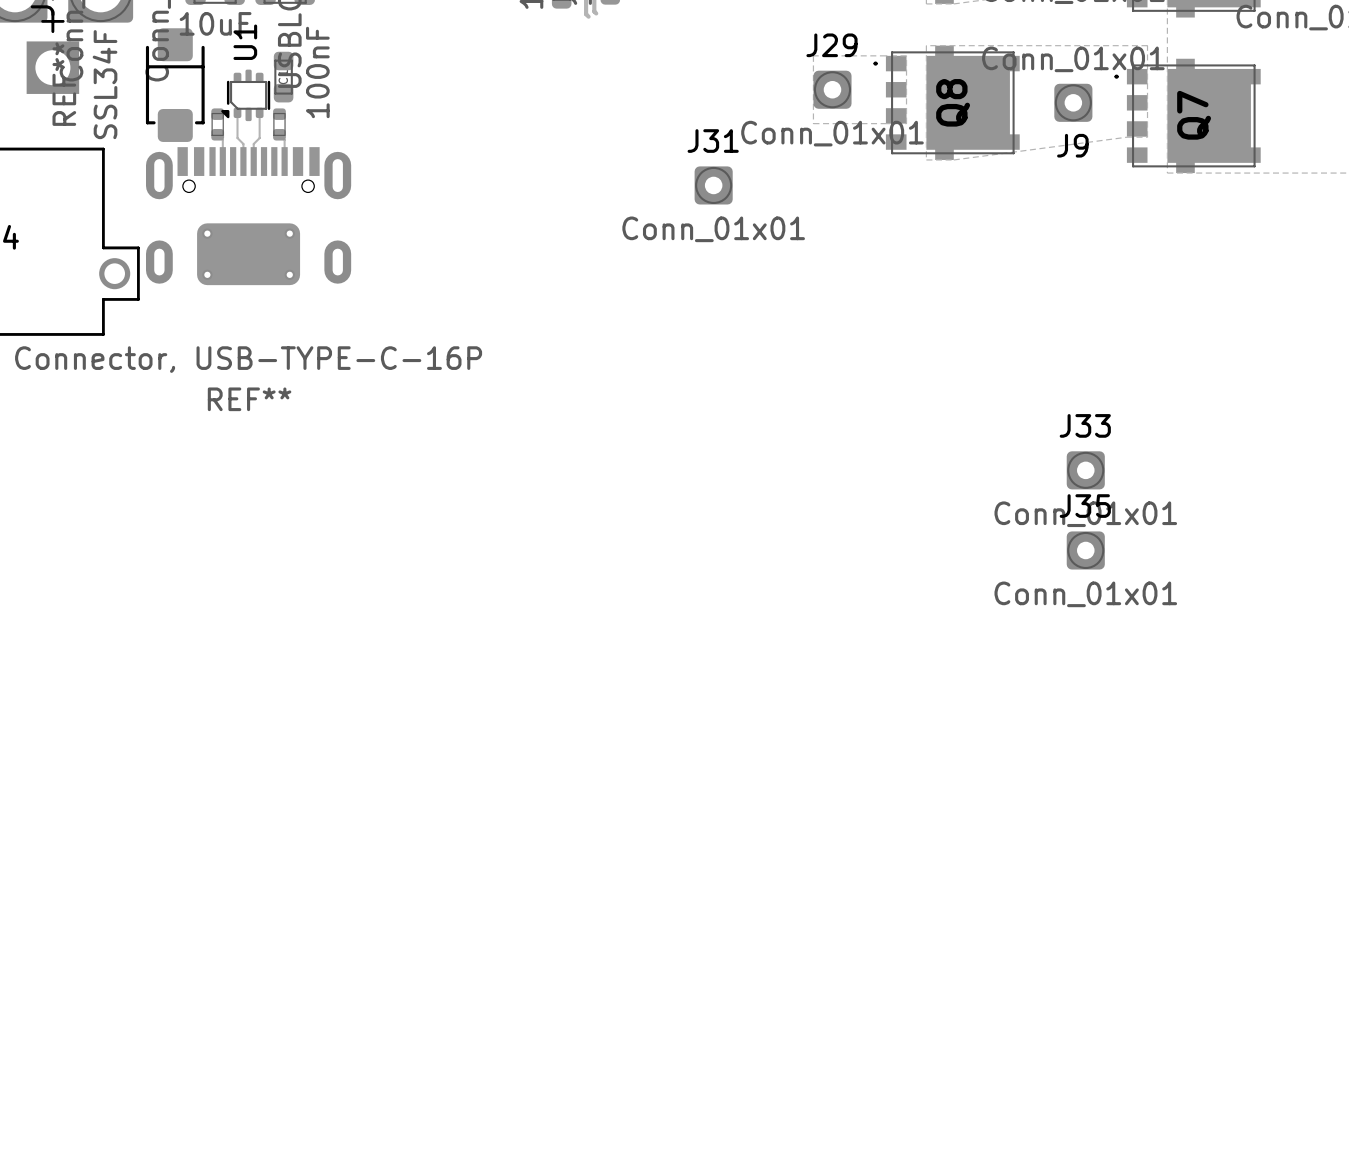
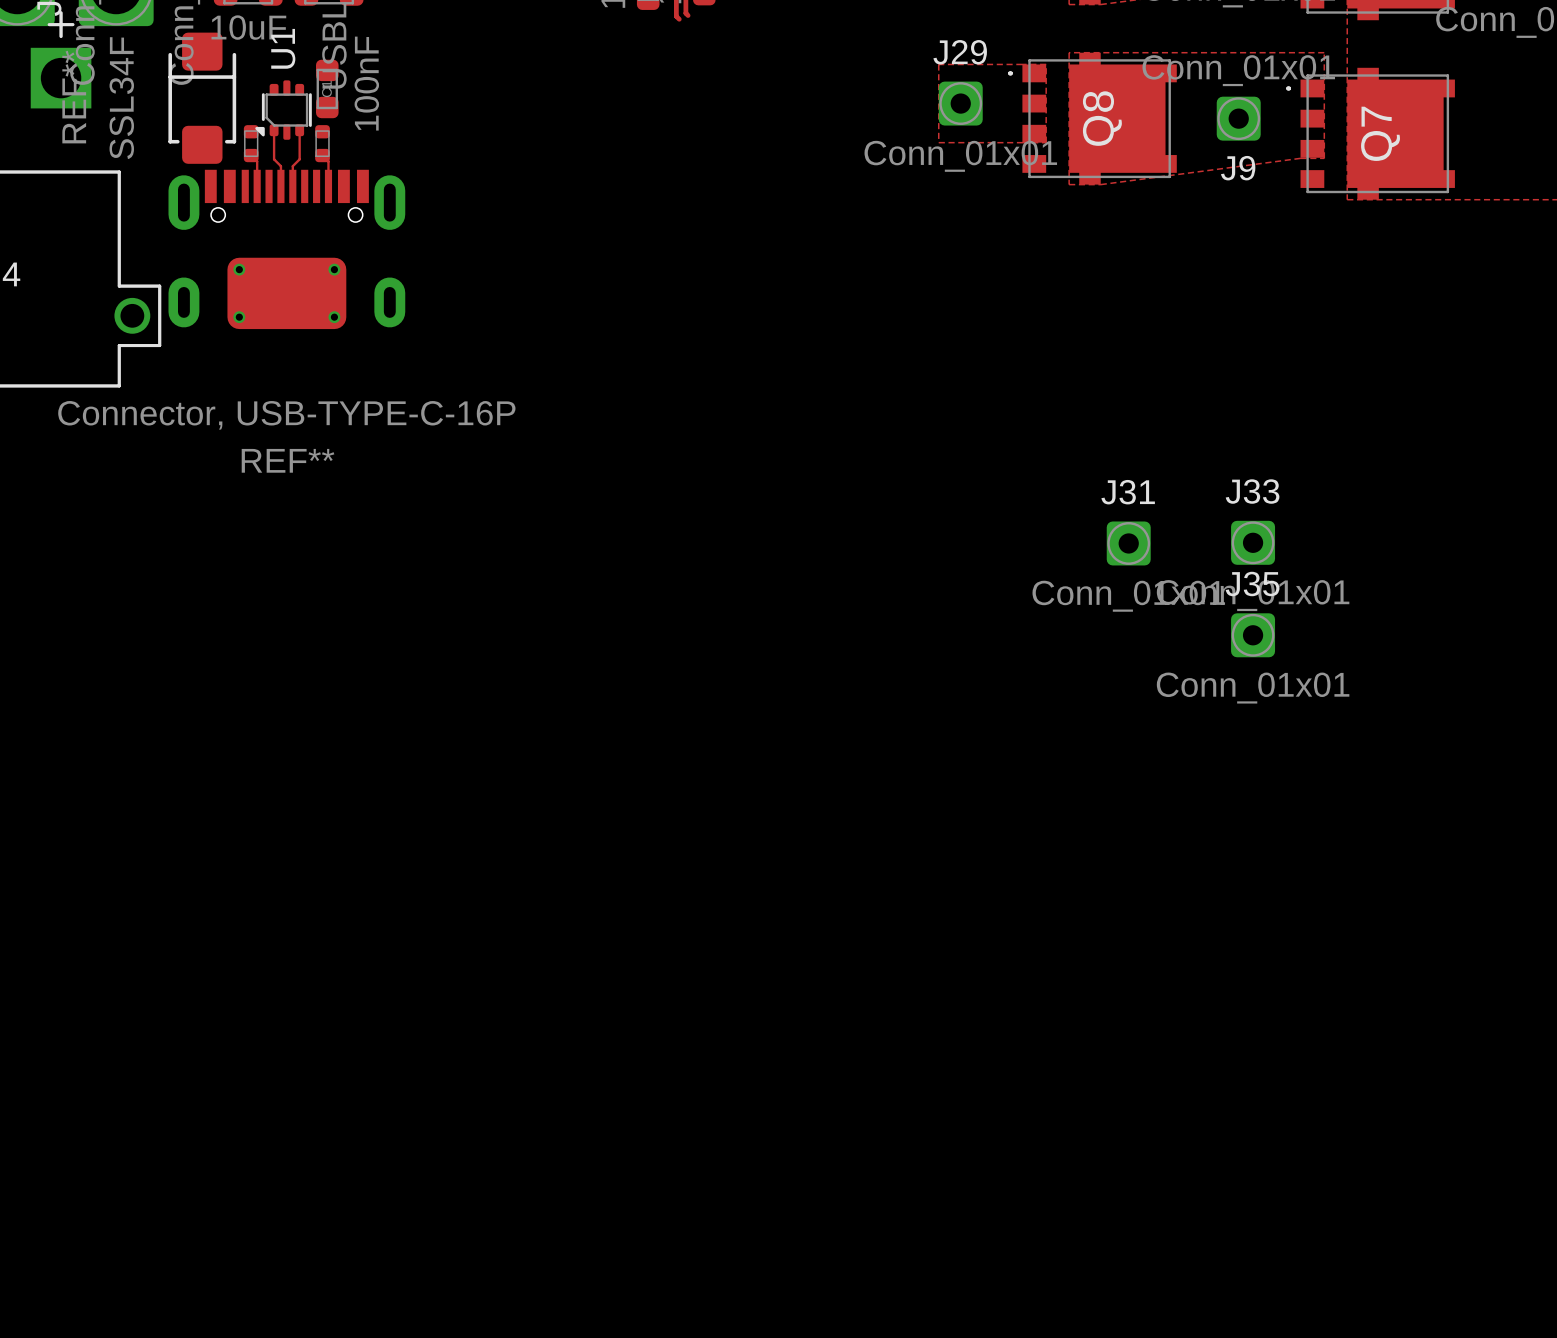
J31 position: (713, 185) -> (1128, 543)

